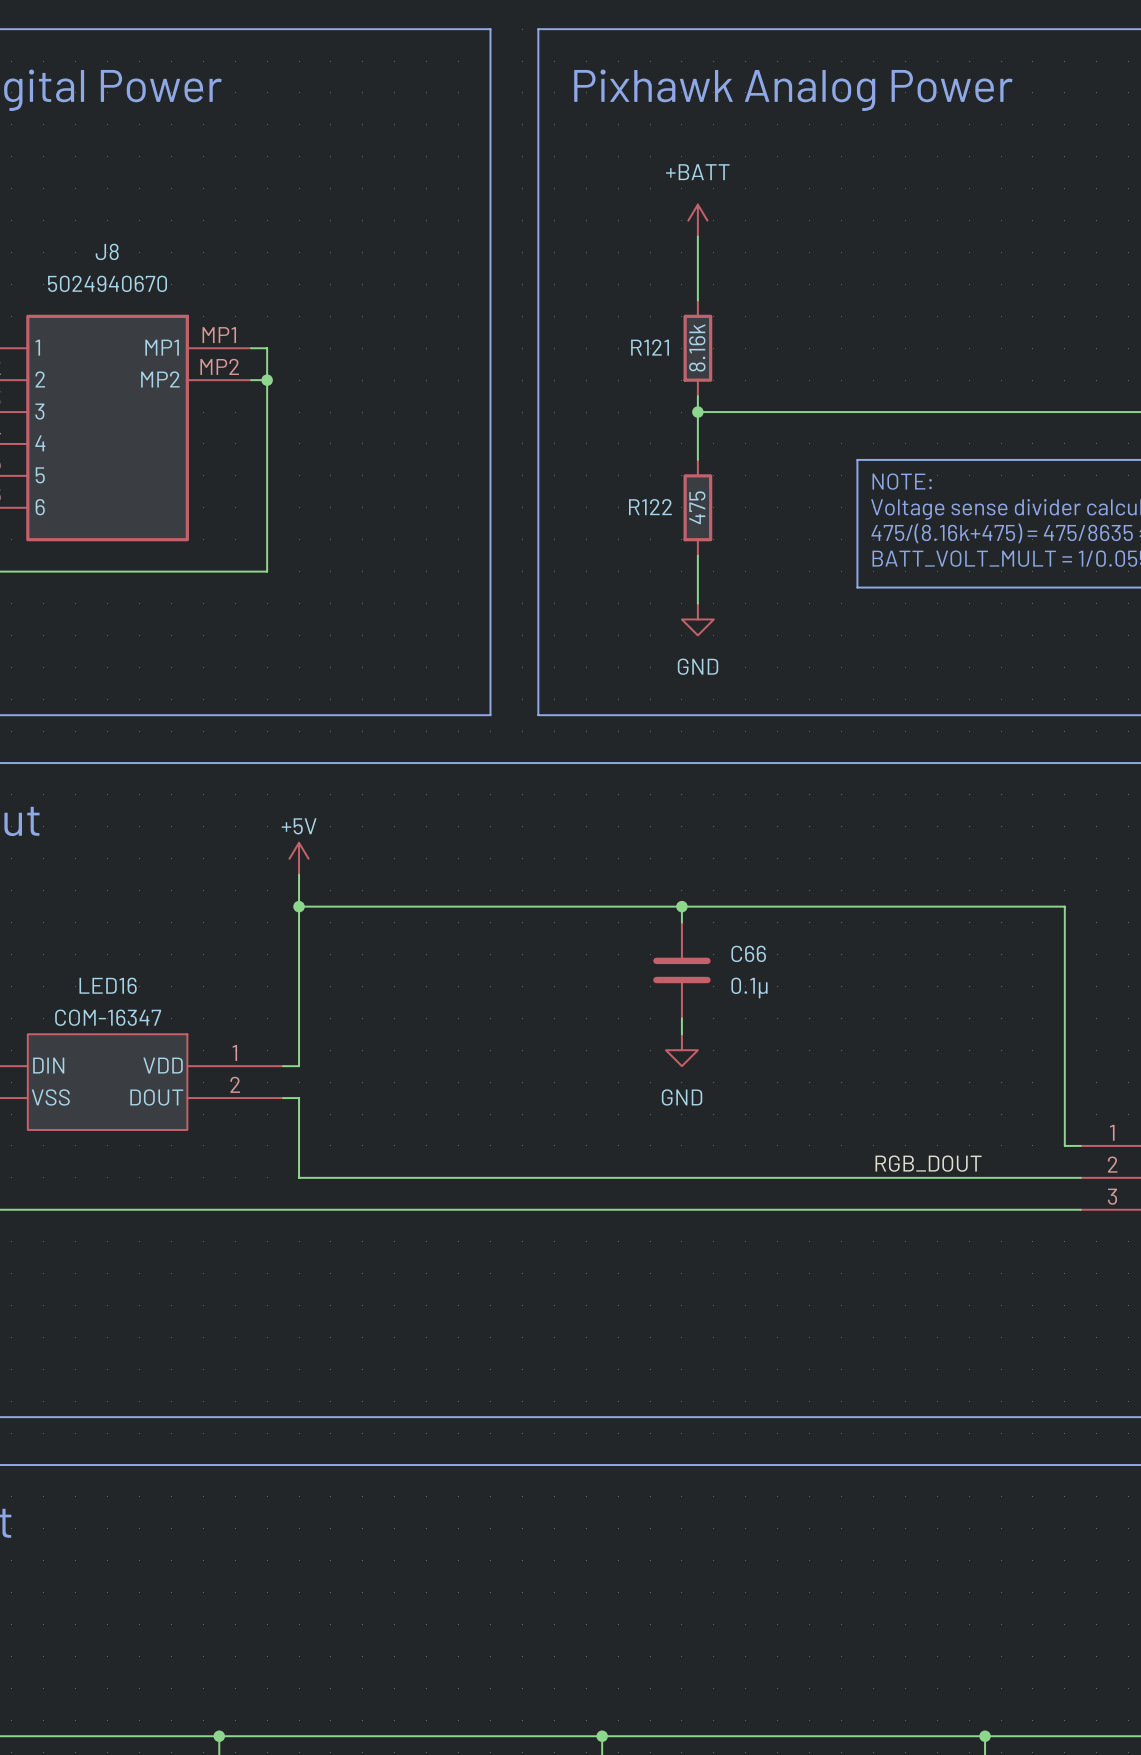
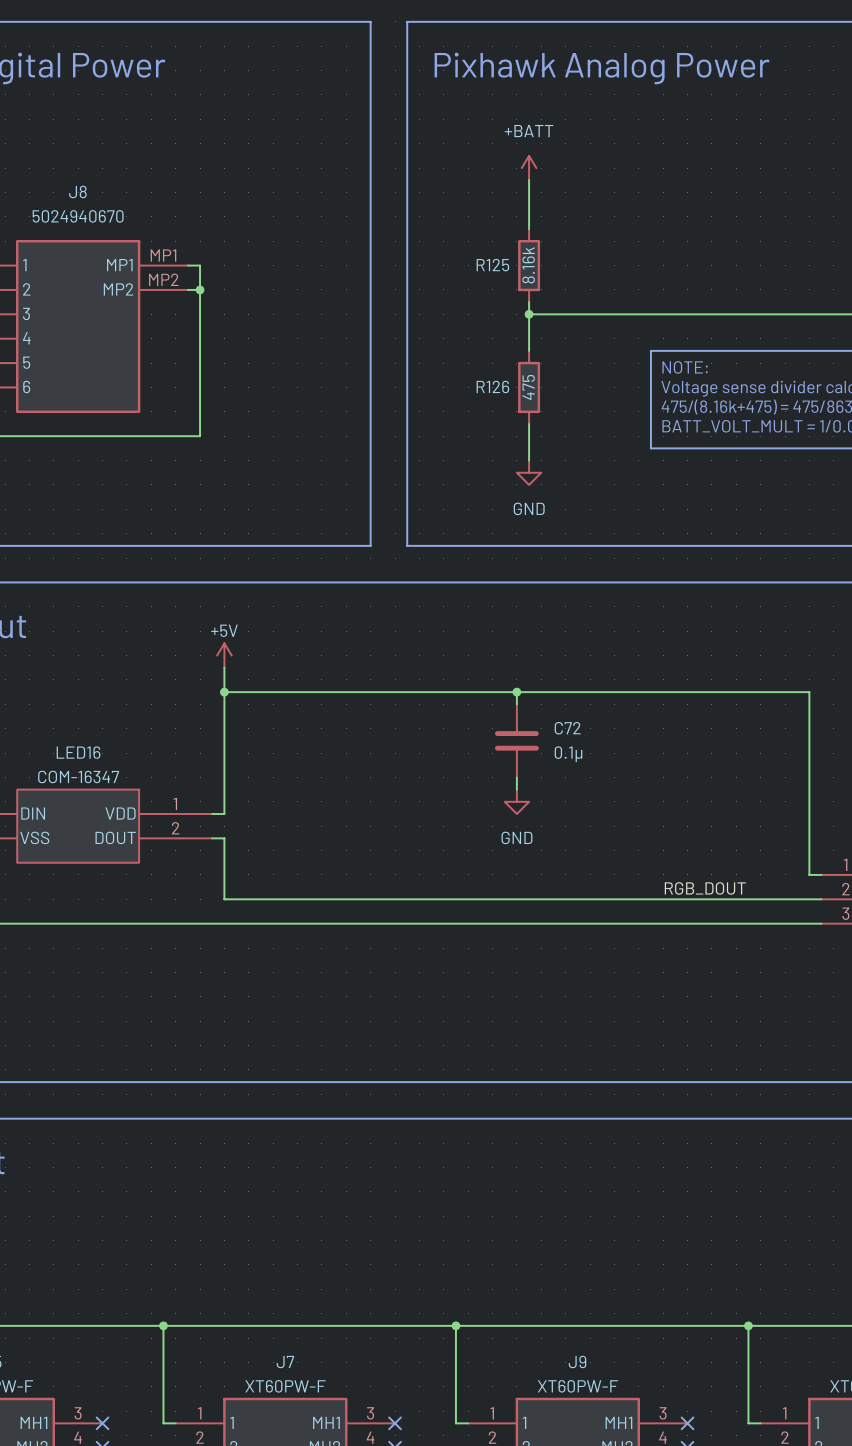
R121 name: R121 (650, 347) -> R125 (492, 265)
R122 name: R122 (650, 507) -> R126 (492, 386)
C66 name: C66 (748, 953) -> C72 (567, 728)

